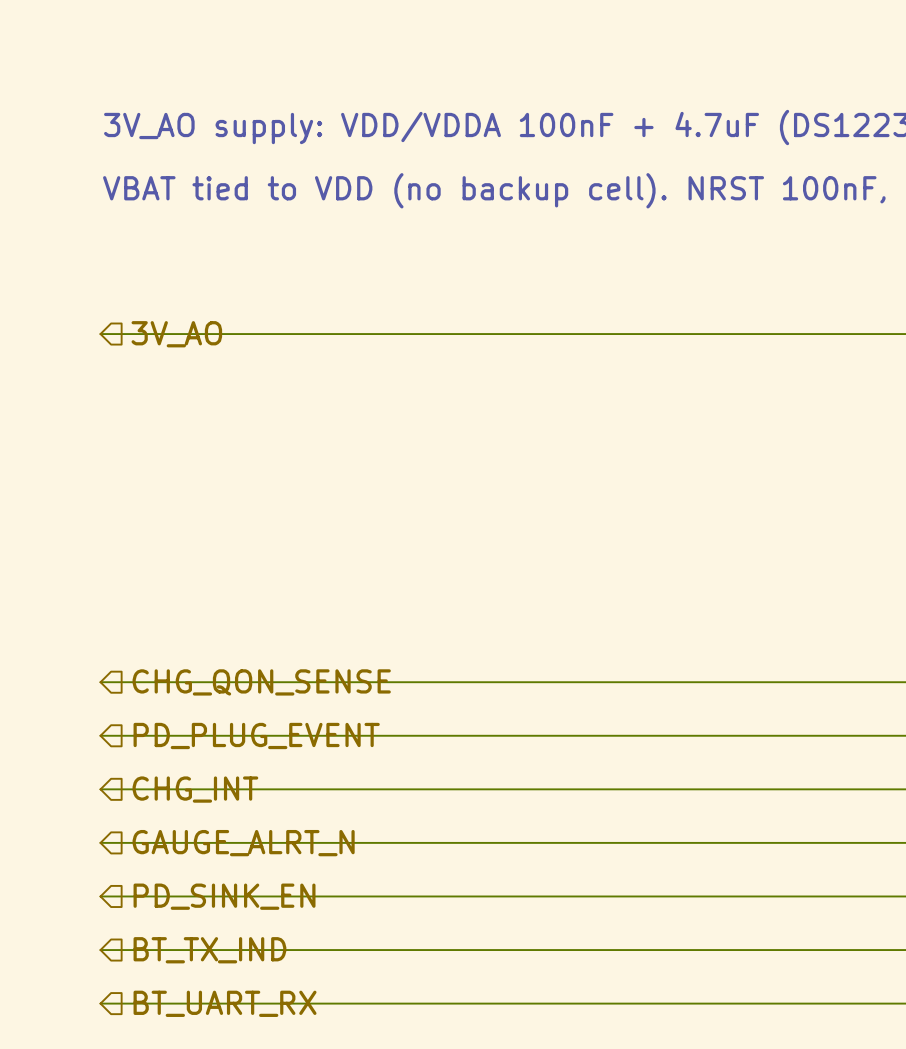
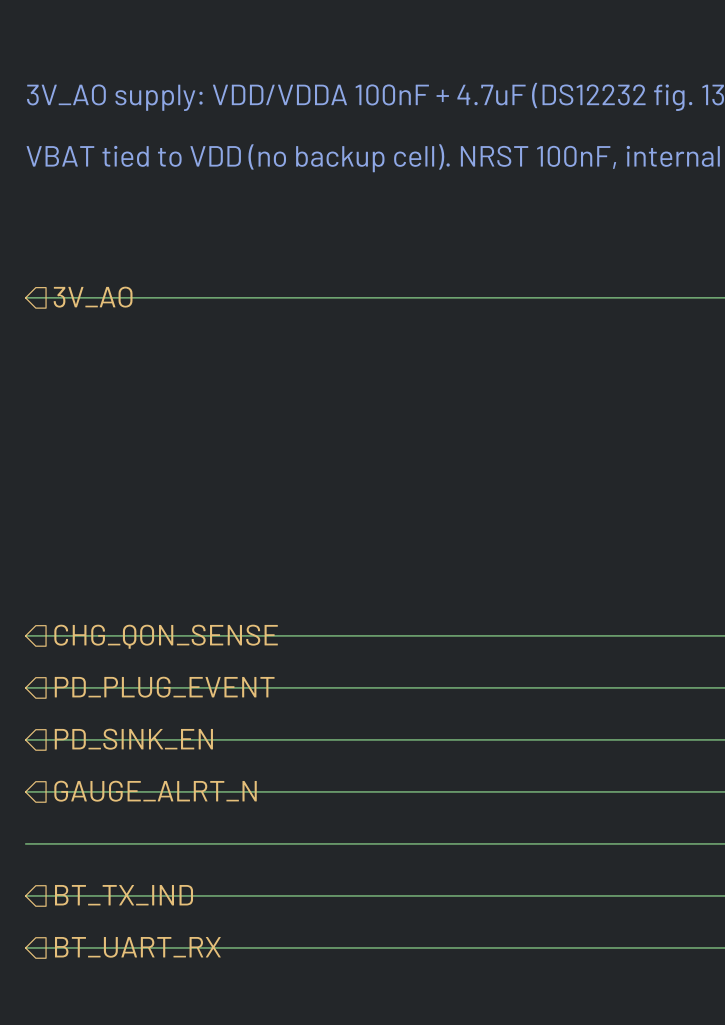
hierarchical label: CHG_INT (195, 789) -> PD_SINK_EN (133, 739)
hierarchical label: PD_SINK_EN (224, 896) -> none

